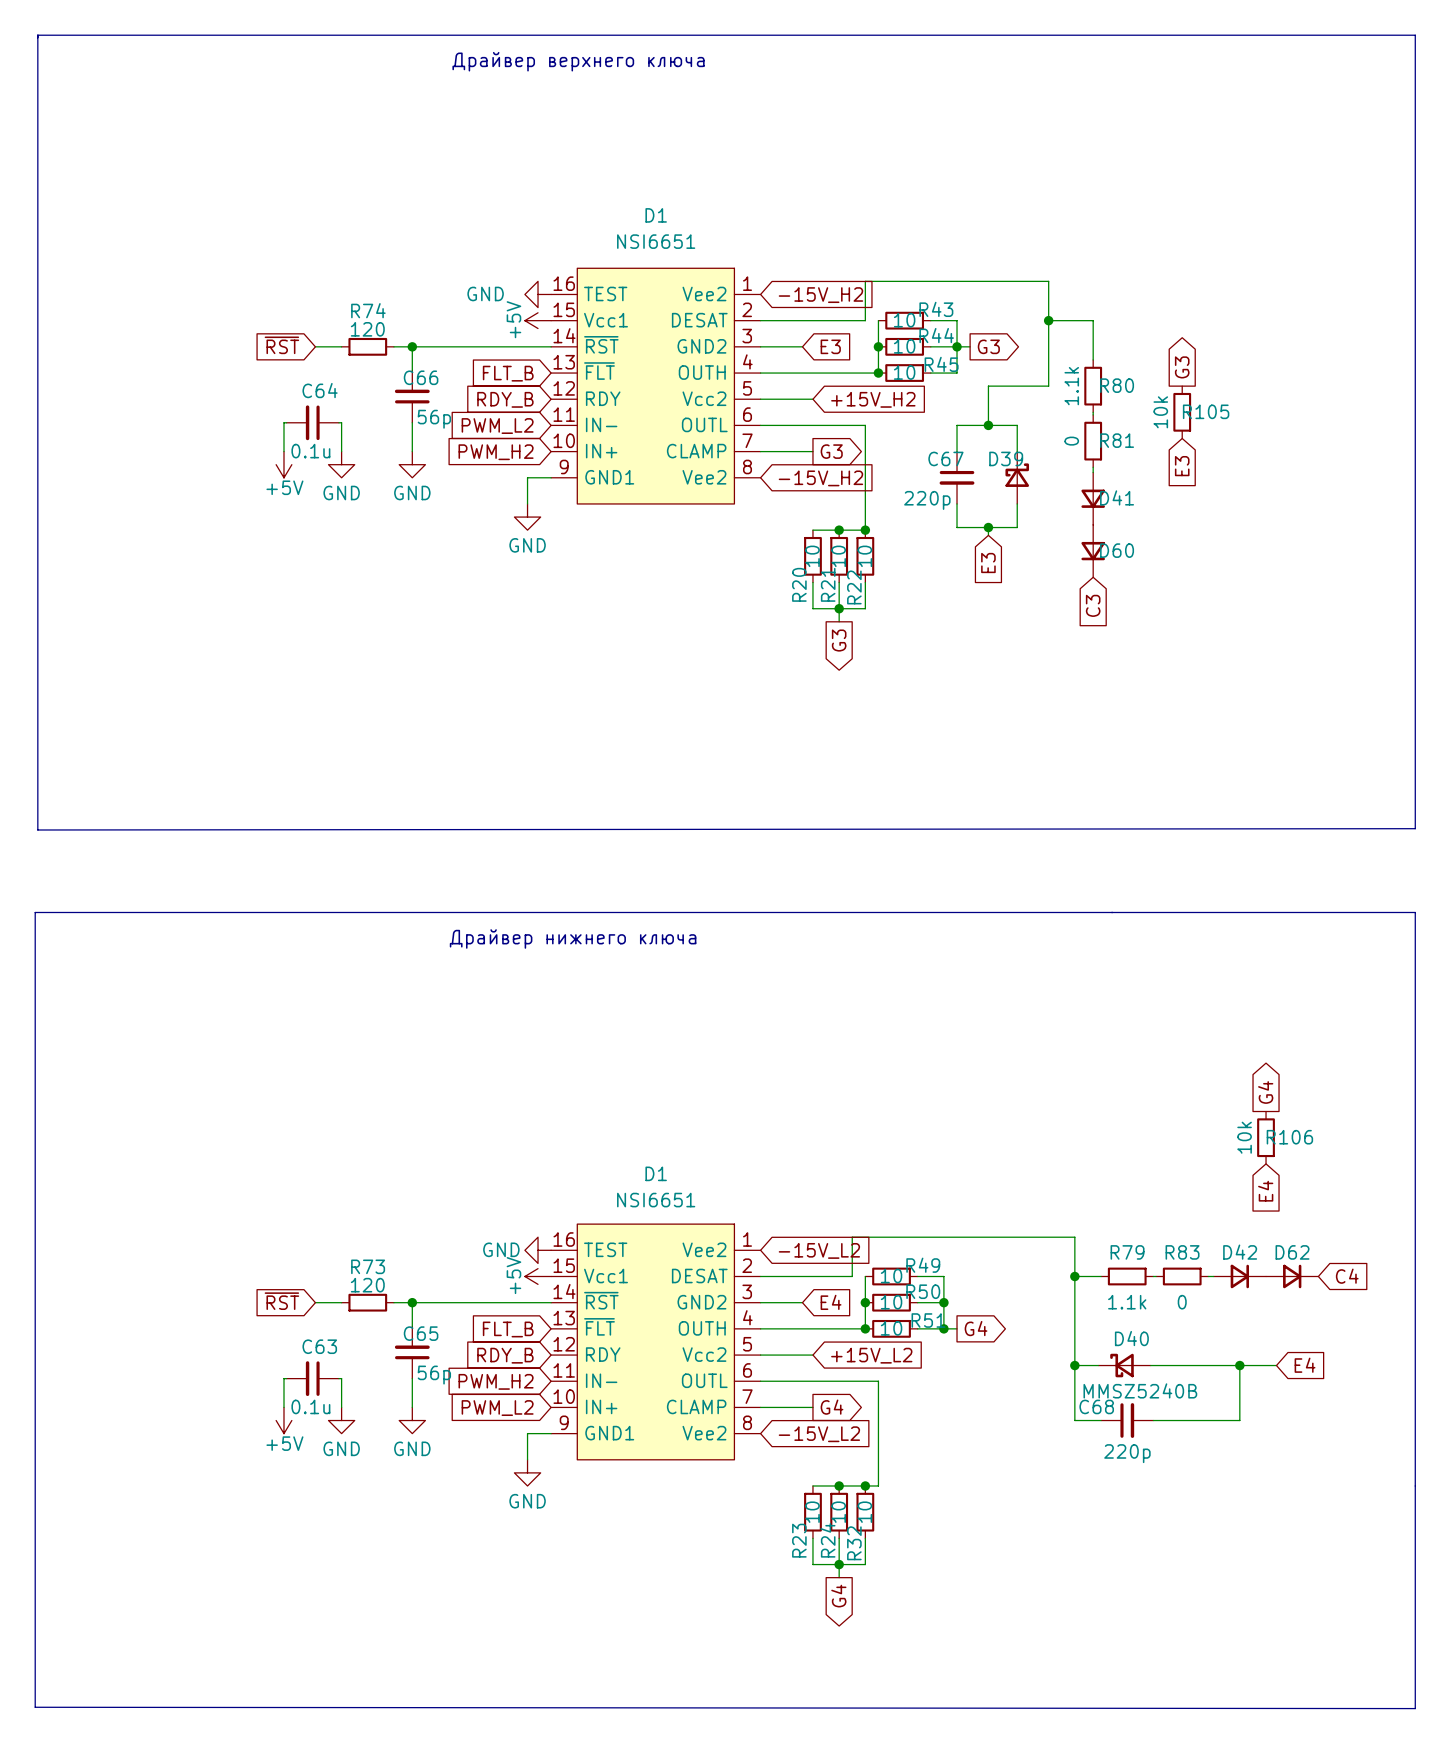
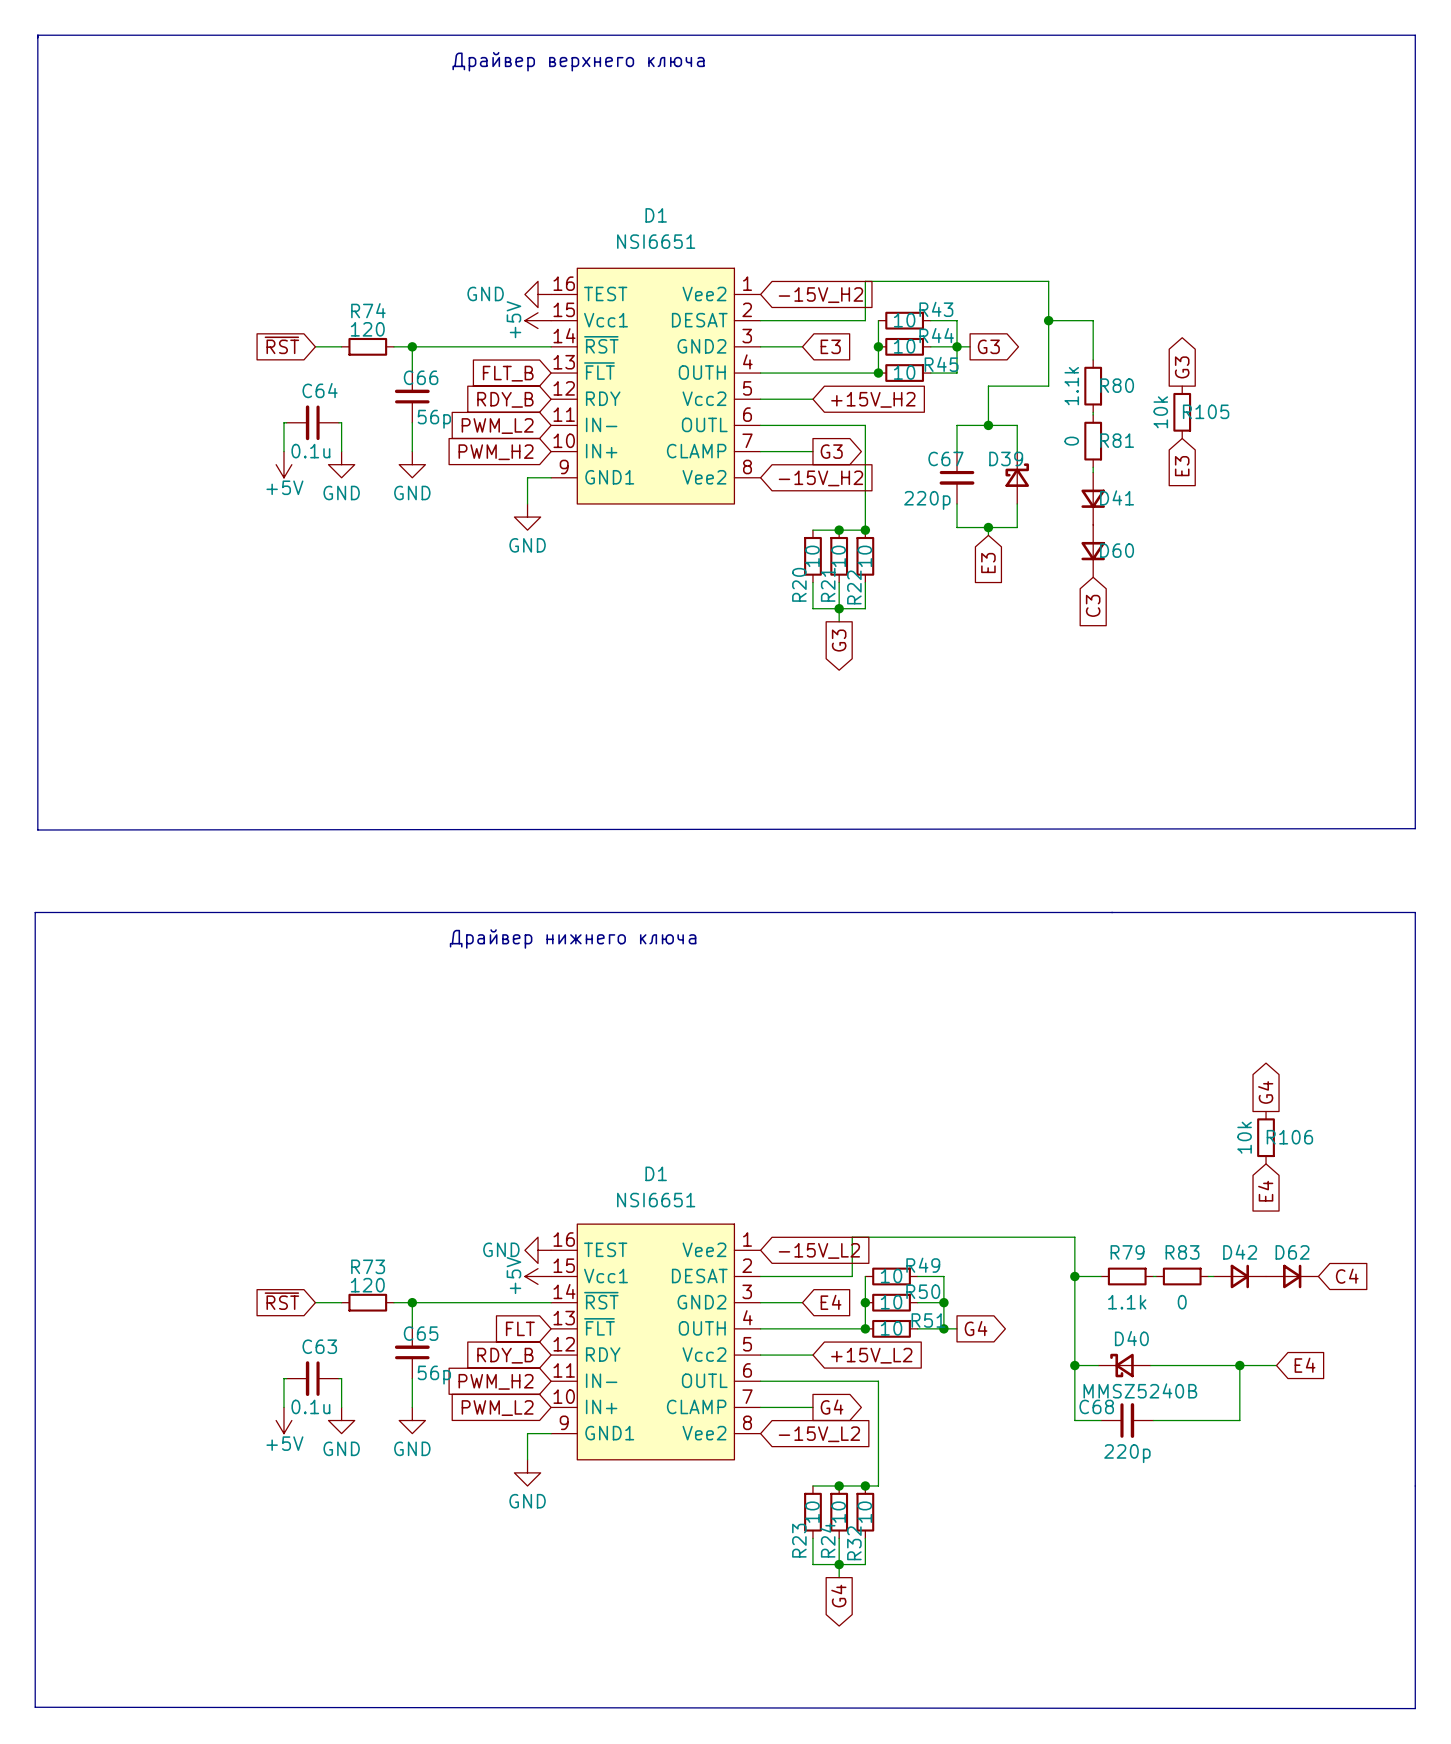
global label: FLT_B (508, 1329) -> FLT (520, 1328)

